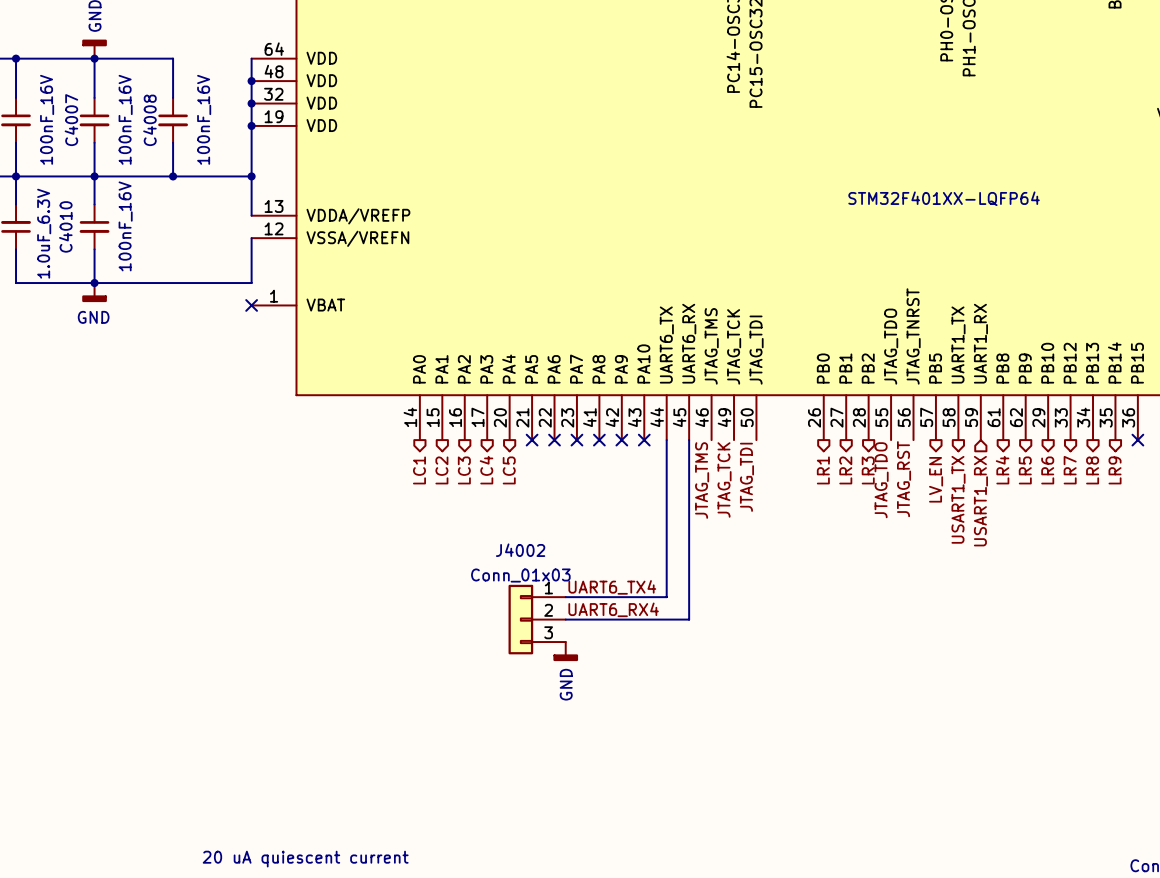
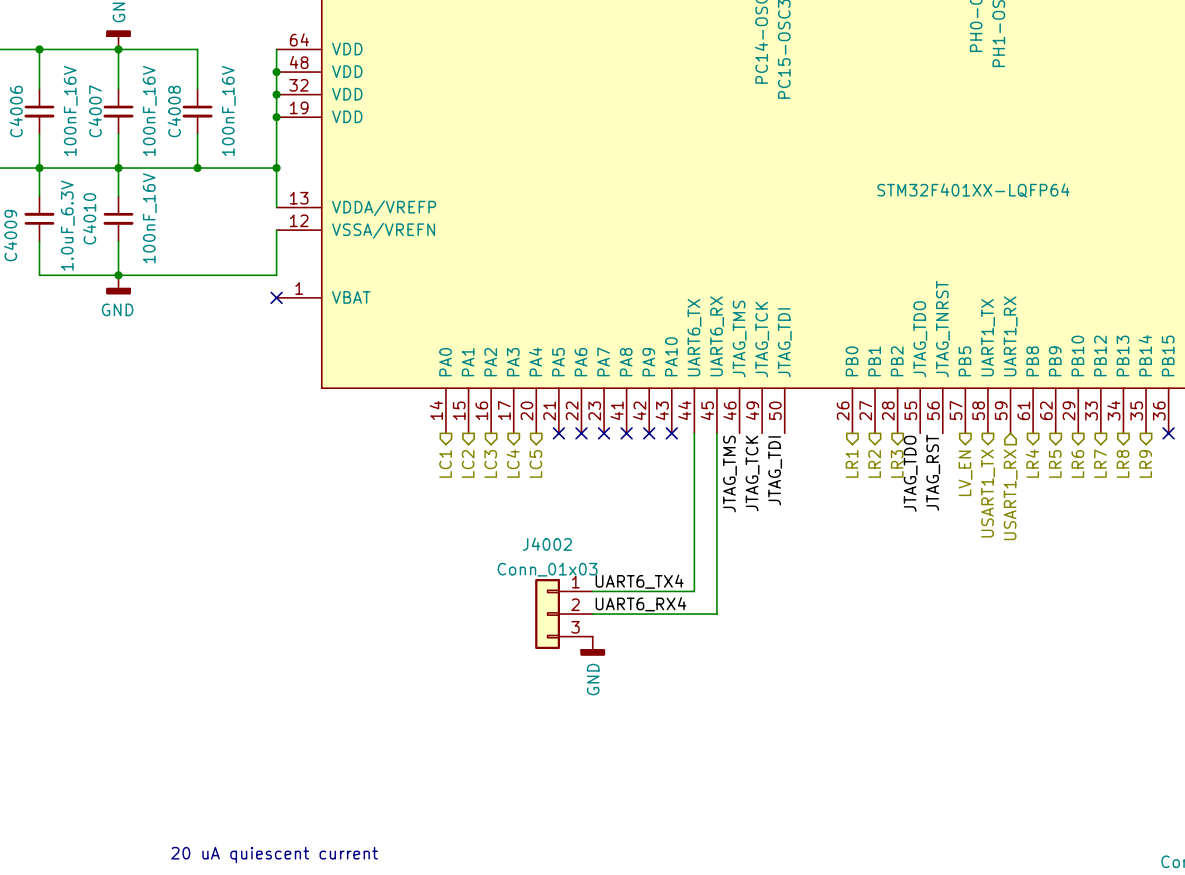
text position: 20 uA quiescent current (305, 859) -> 20 uA quiescent current (274, 855)

